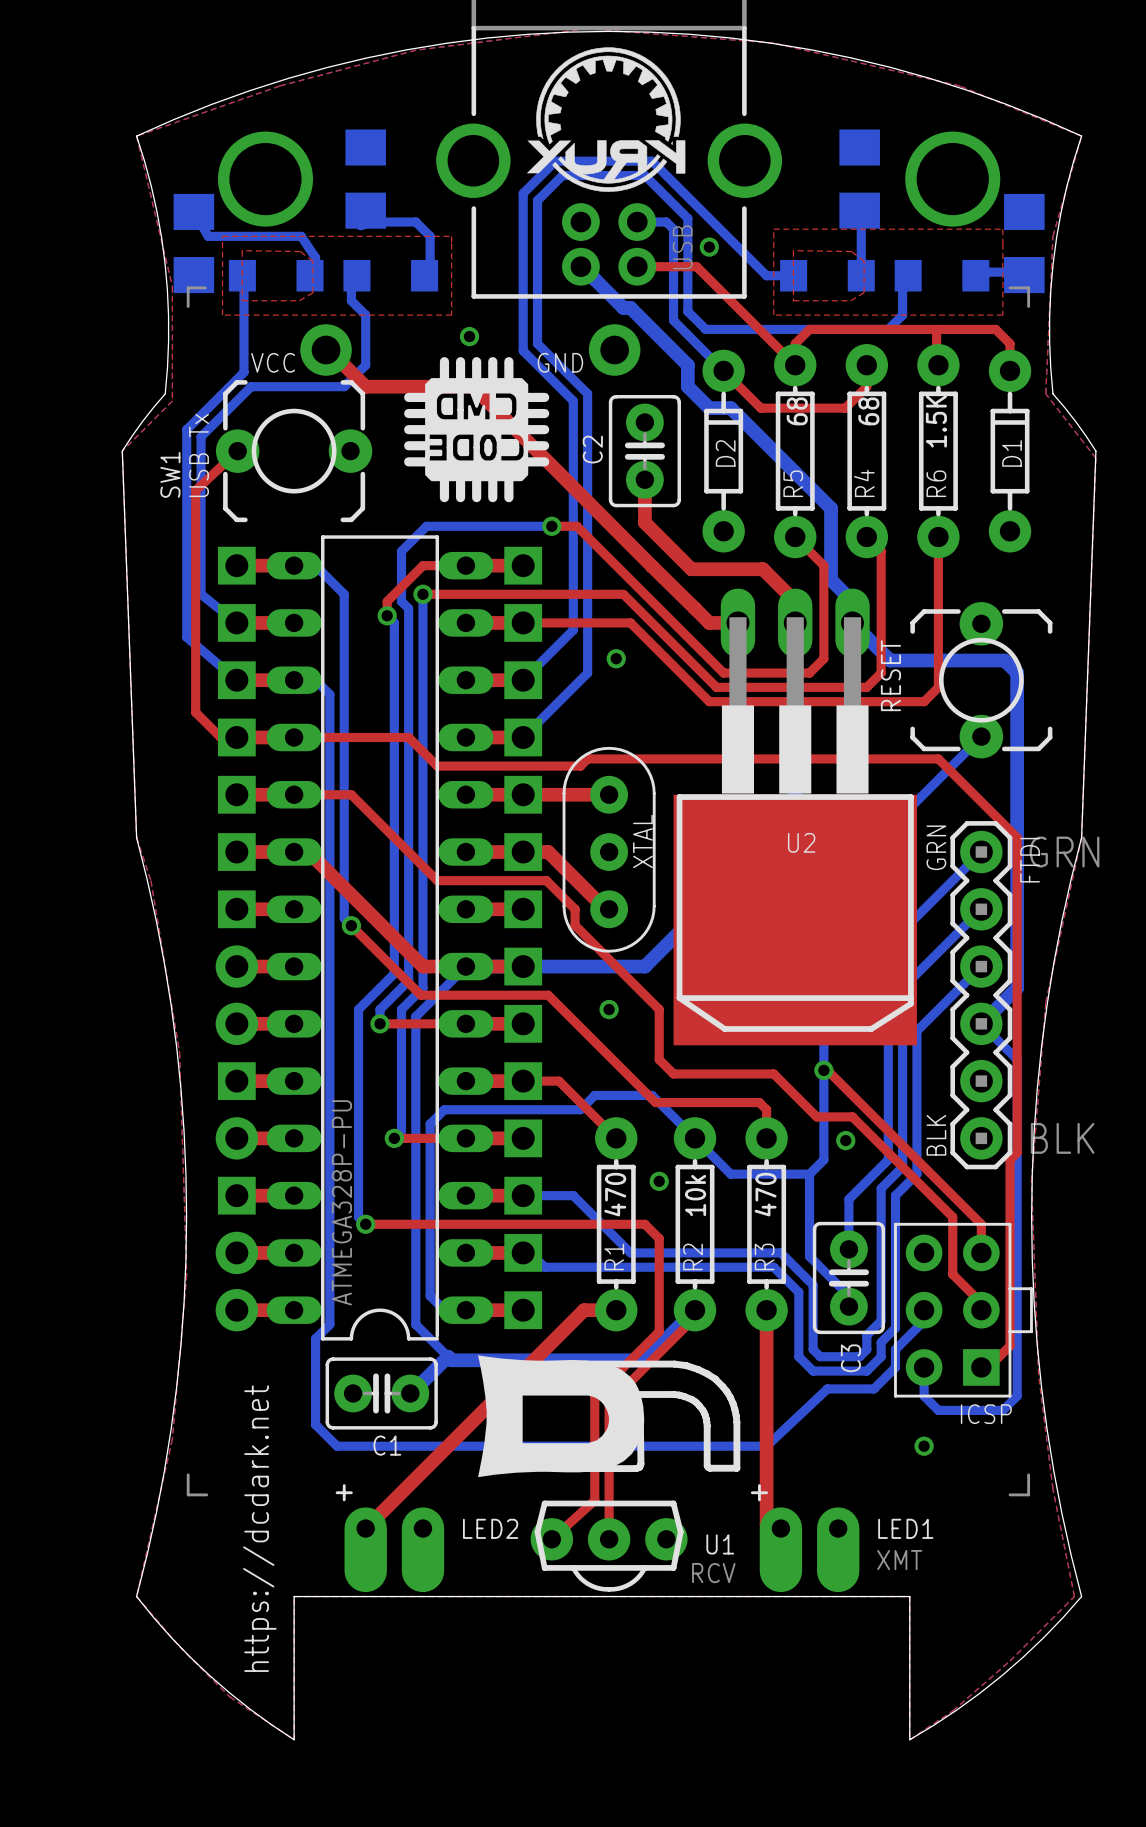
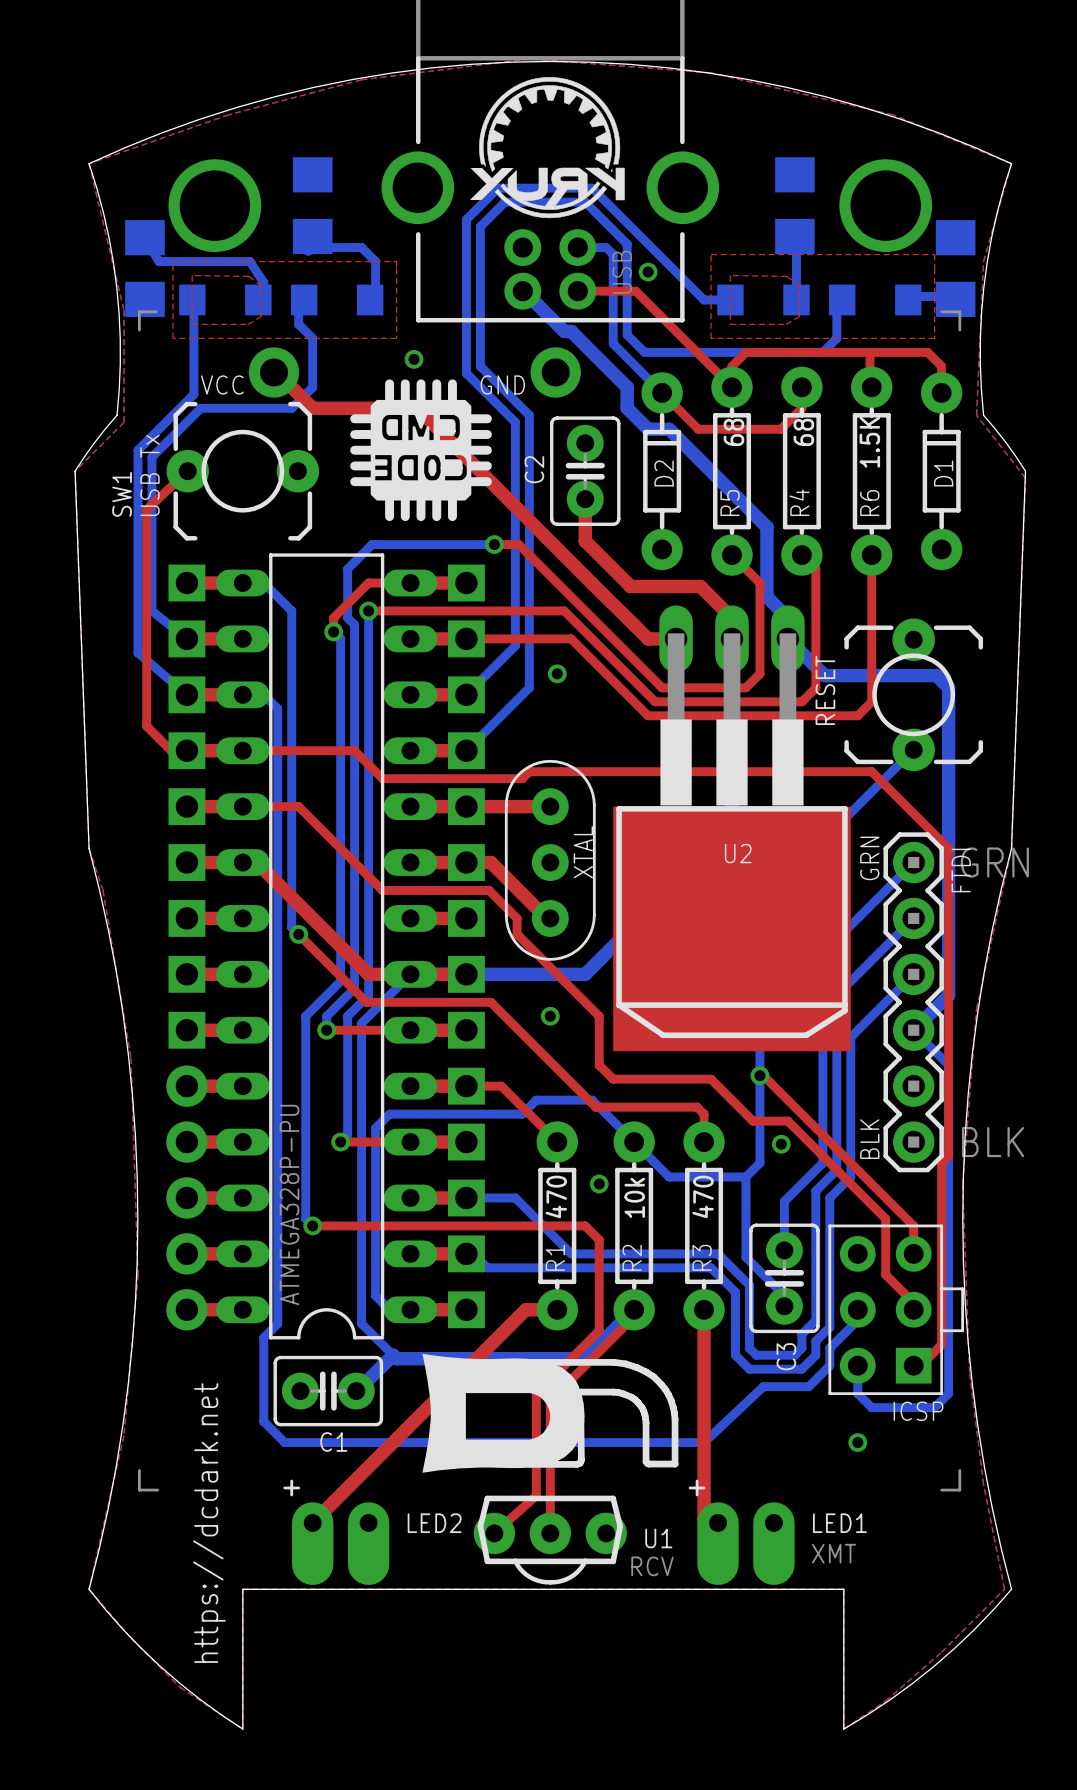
part footprint: [215, 945, 259, 988] -> [168, 955, 206, 993]
part footprint: [215, 1002, 259, 1046] -> [168, 1011, 206, 1049]
part footprint: [217, 1062, 256, 1101] -> [166, 1065, 208, 1107]
part footprint: [217, 1176, 256, 1215] -> [166, 1177, 208, 1219]

